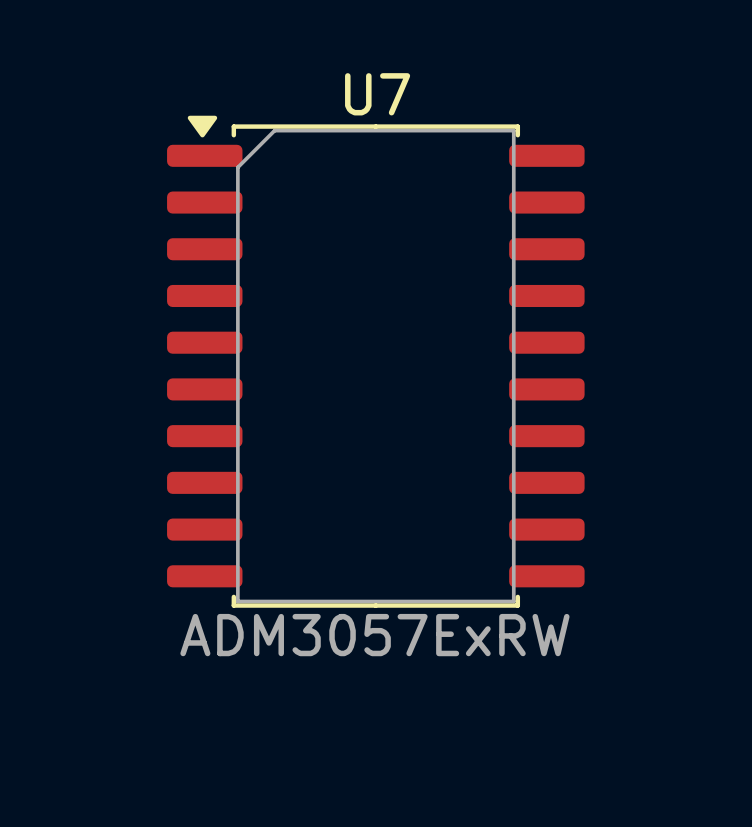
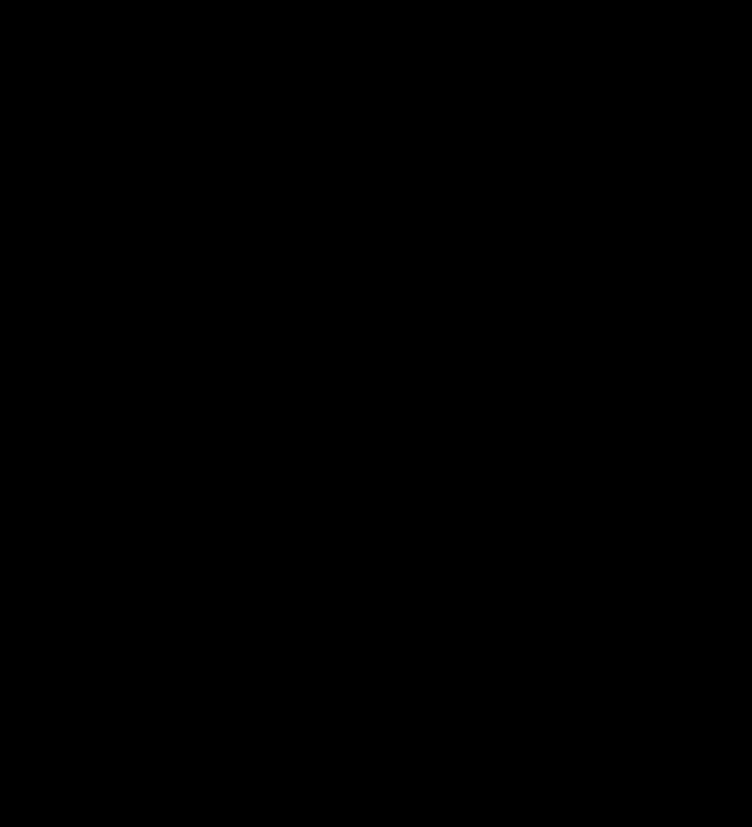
U7: ADM3057ExRW (375, 361) -> none

